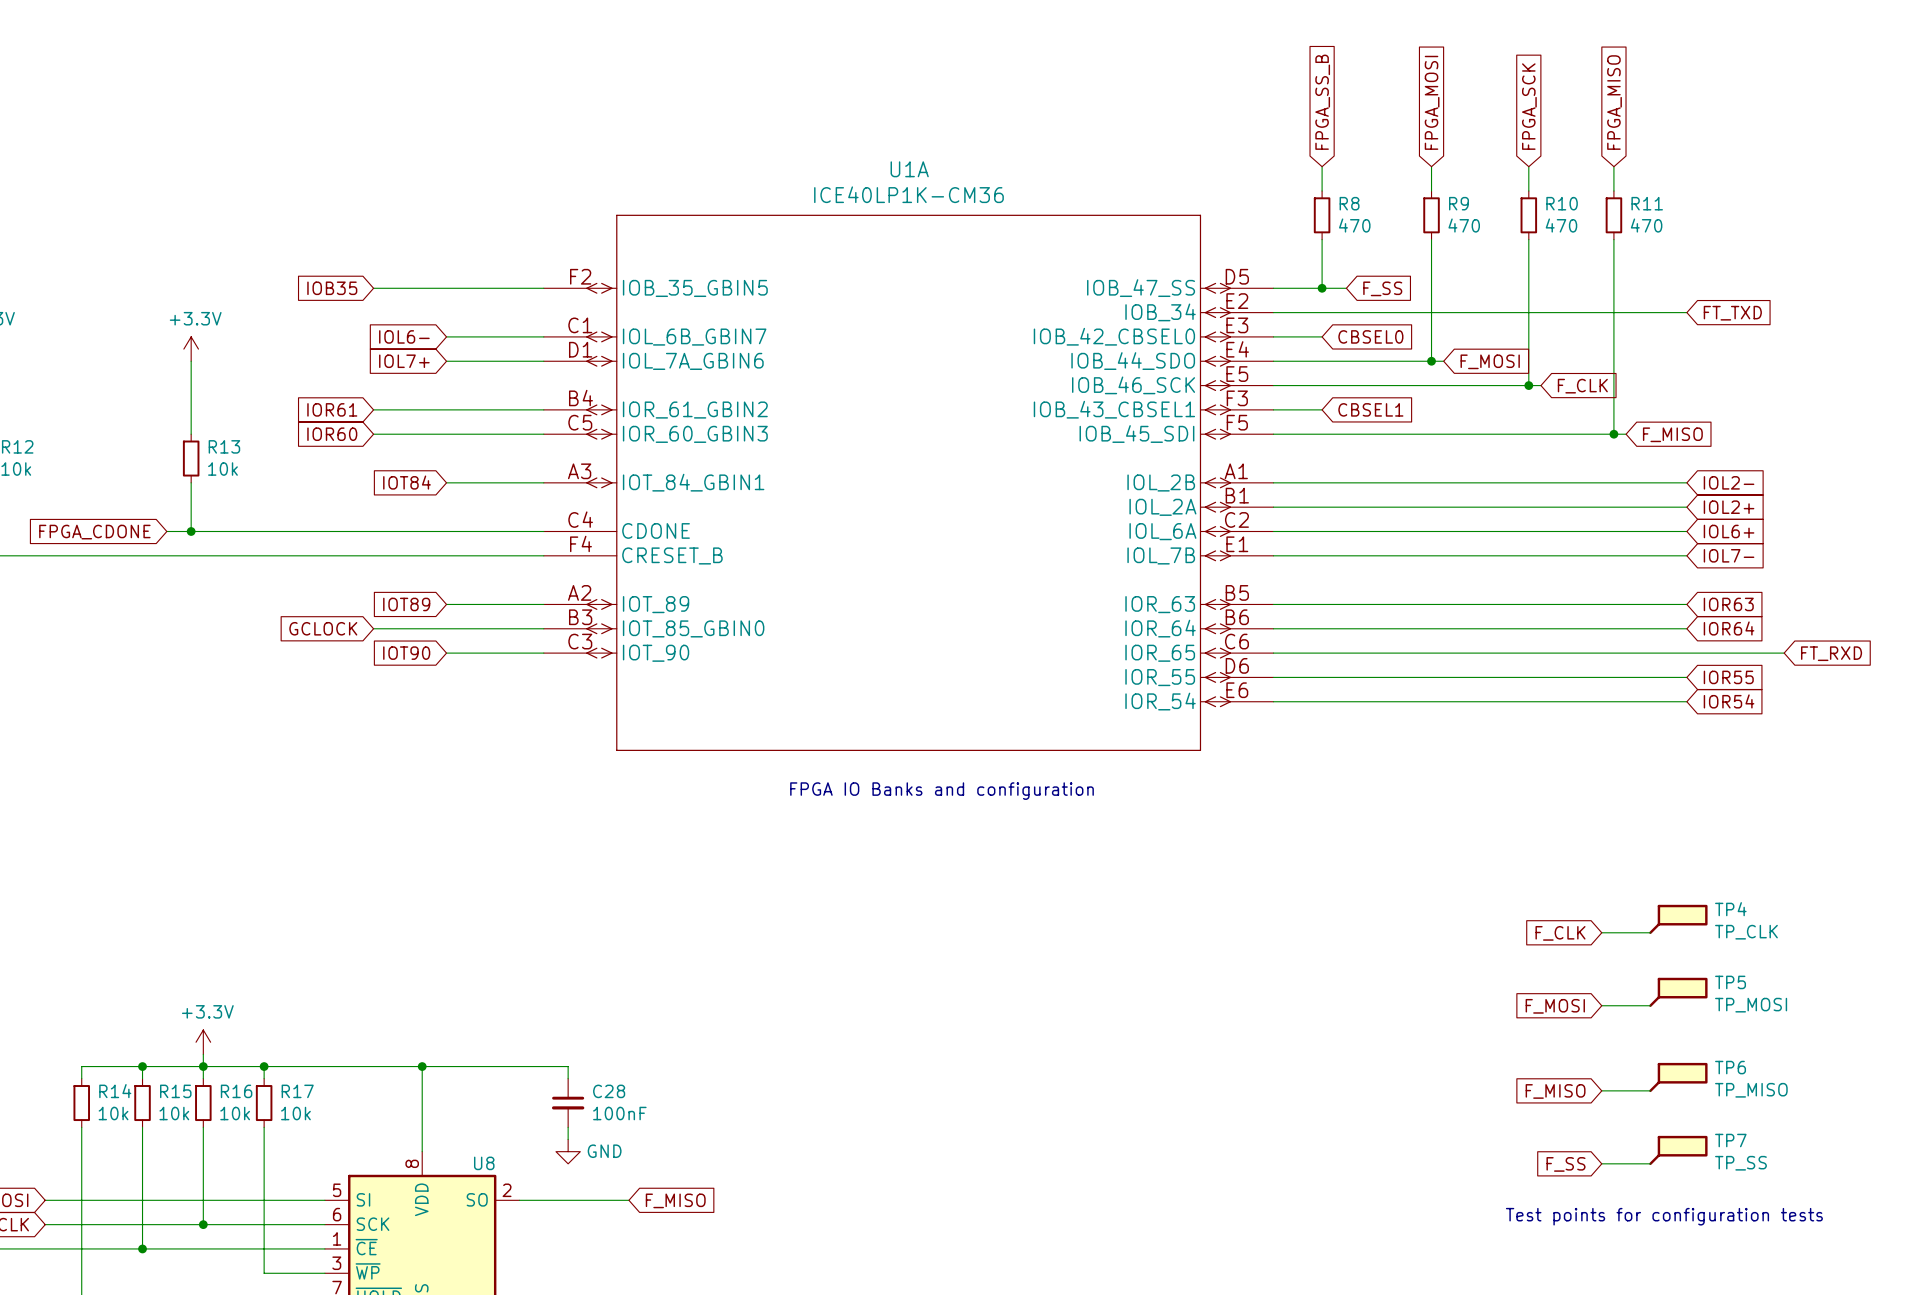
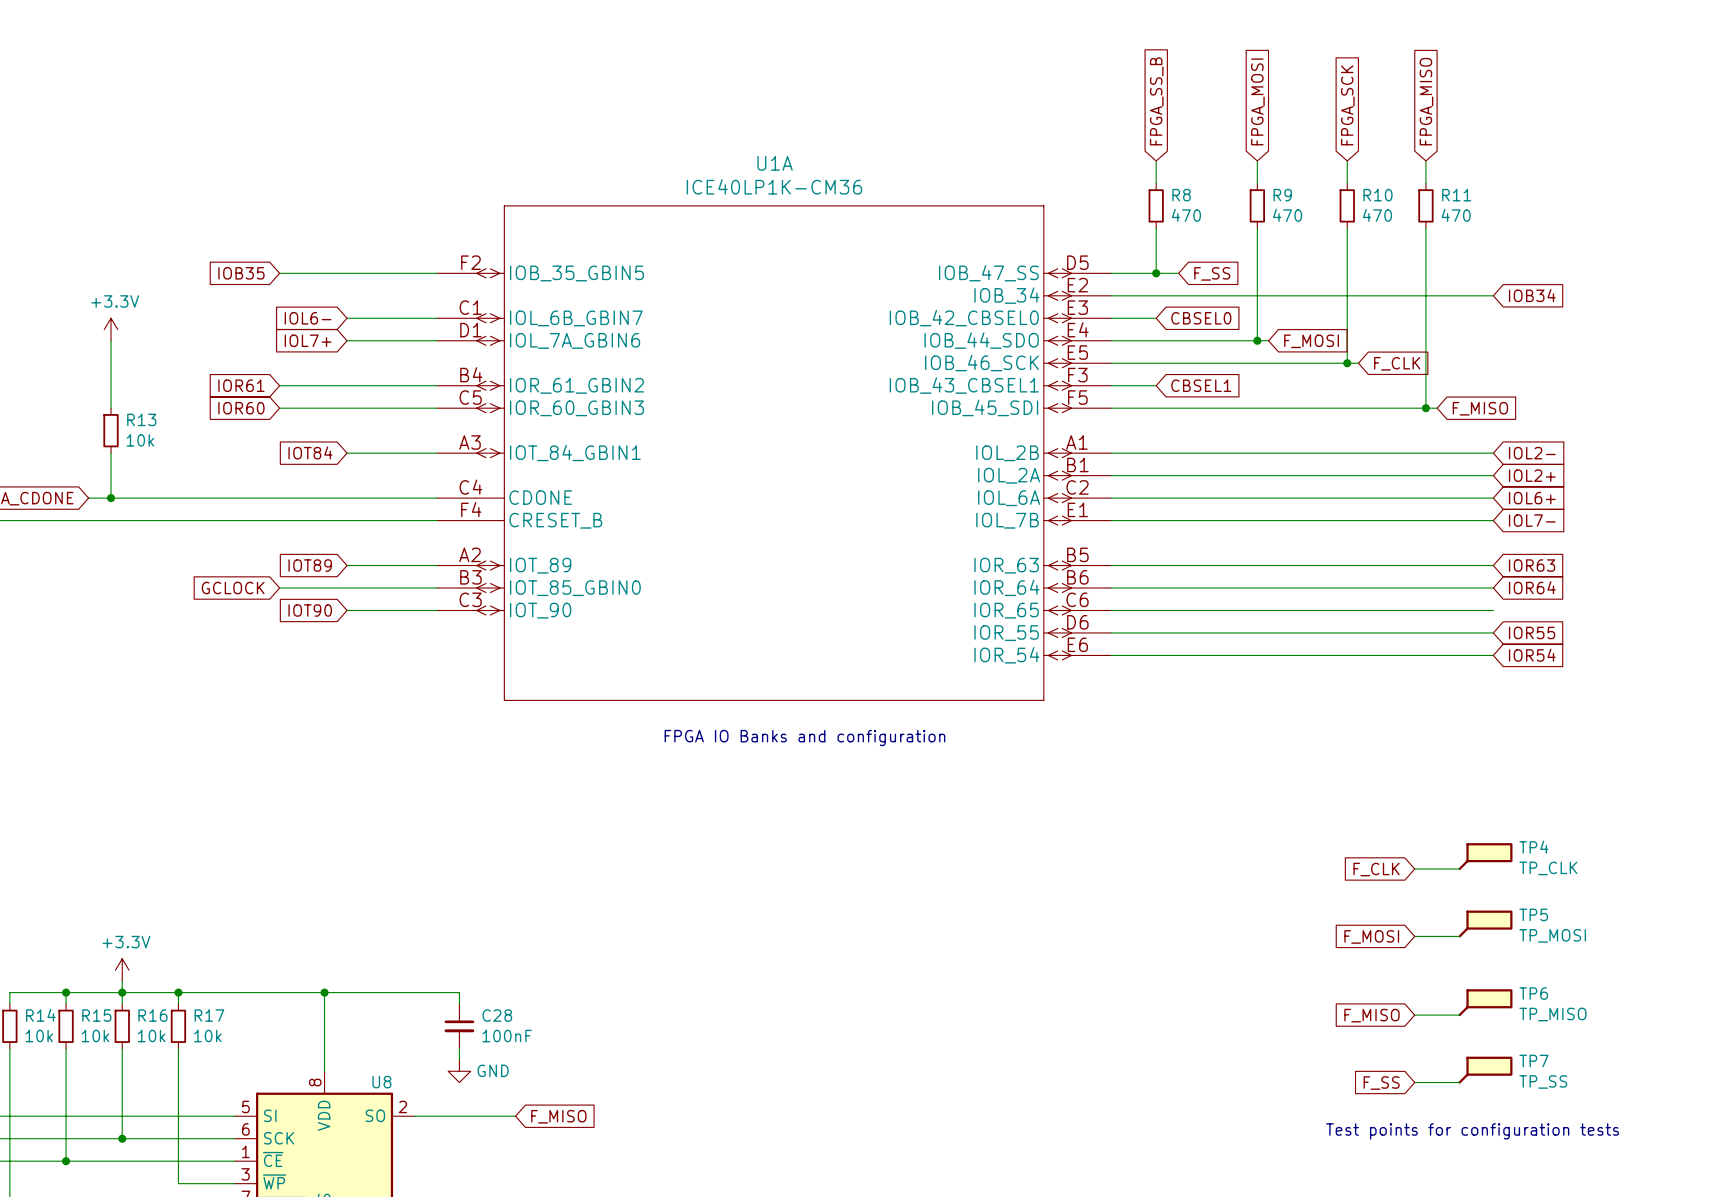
global label: FT_TXD (1732, 313) -> IOB34 (1532, 295)
wire: (1686, 653) (1784, 653) -> none
global label: FT_RXD (1831, 653) -> none

